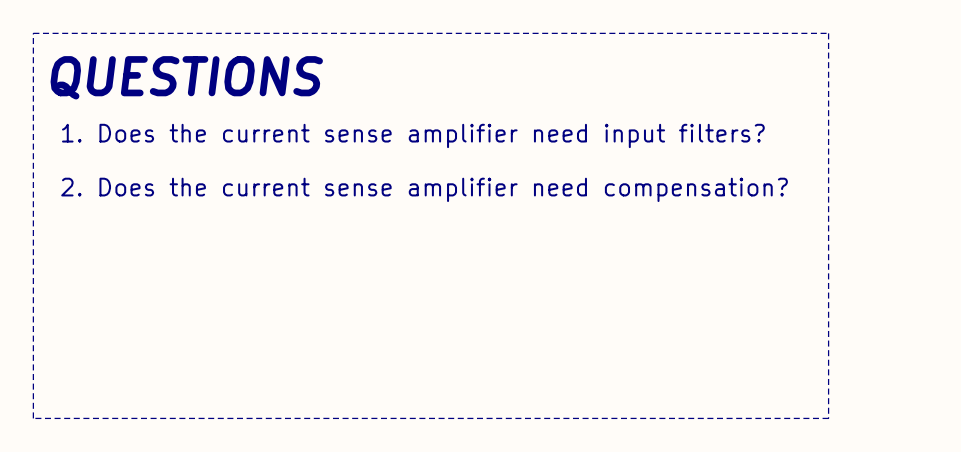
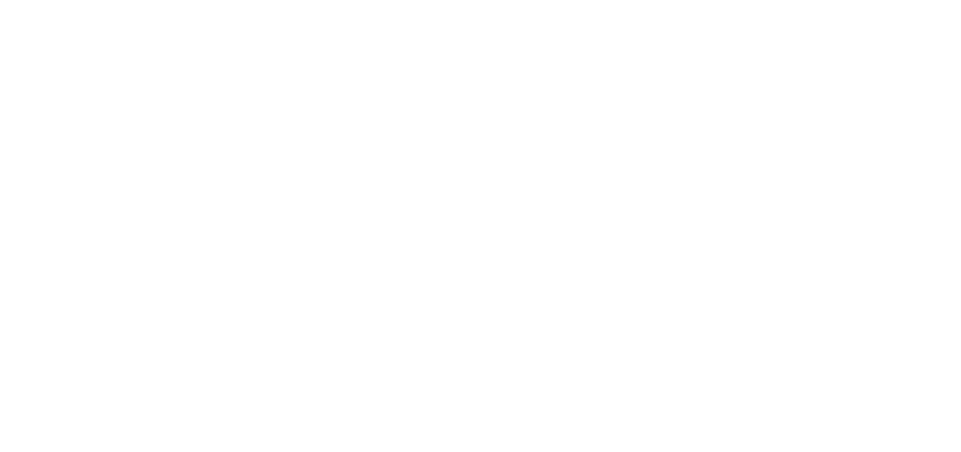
line: (33, 33) (828, 33) (828, 418) (33, 418) (33, 33) -> none
text: QUESTIONS (186, 77) -> none
text: 1. Does the current sense amplifier need input filters? (413, 135) -> none
text: 2. Does the current sense amplifier need compensation? (424, 189) -> none

